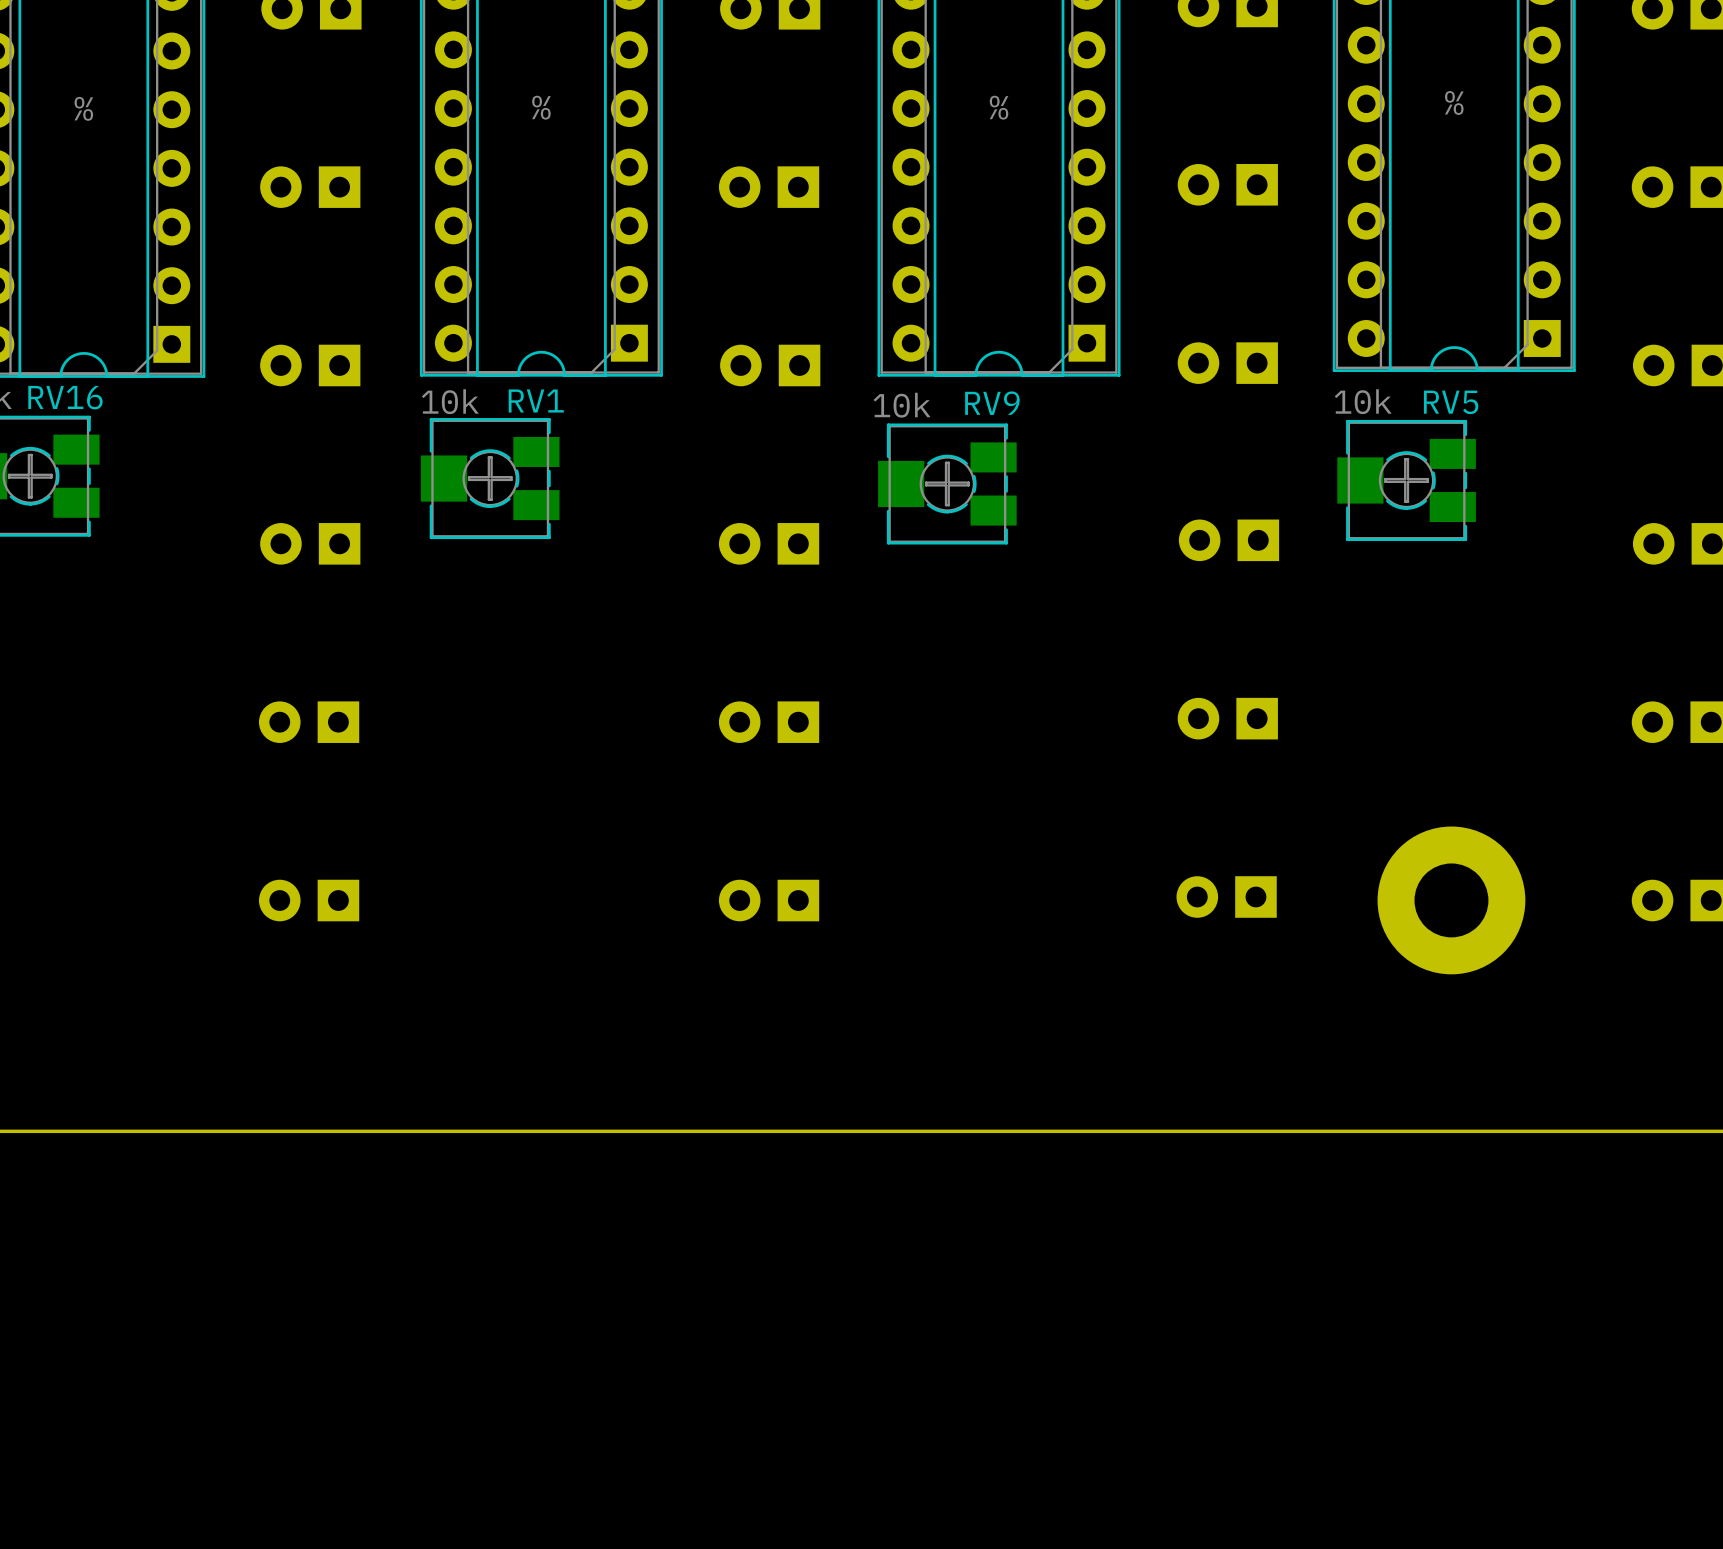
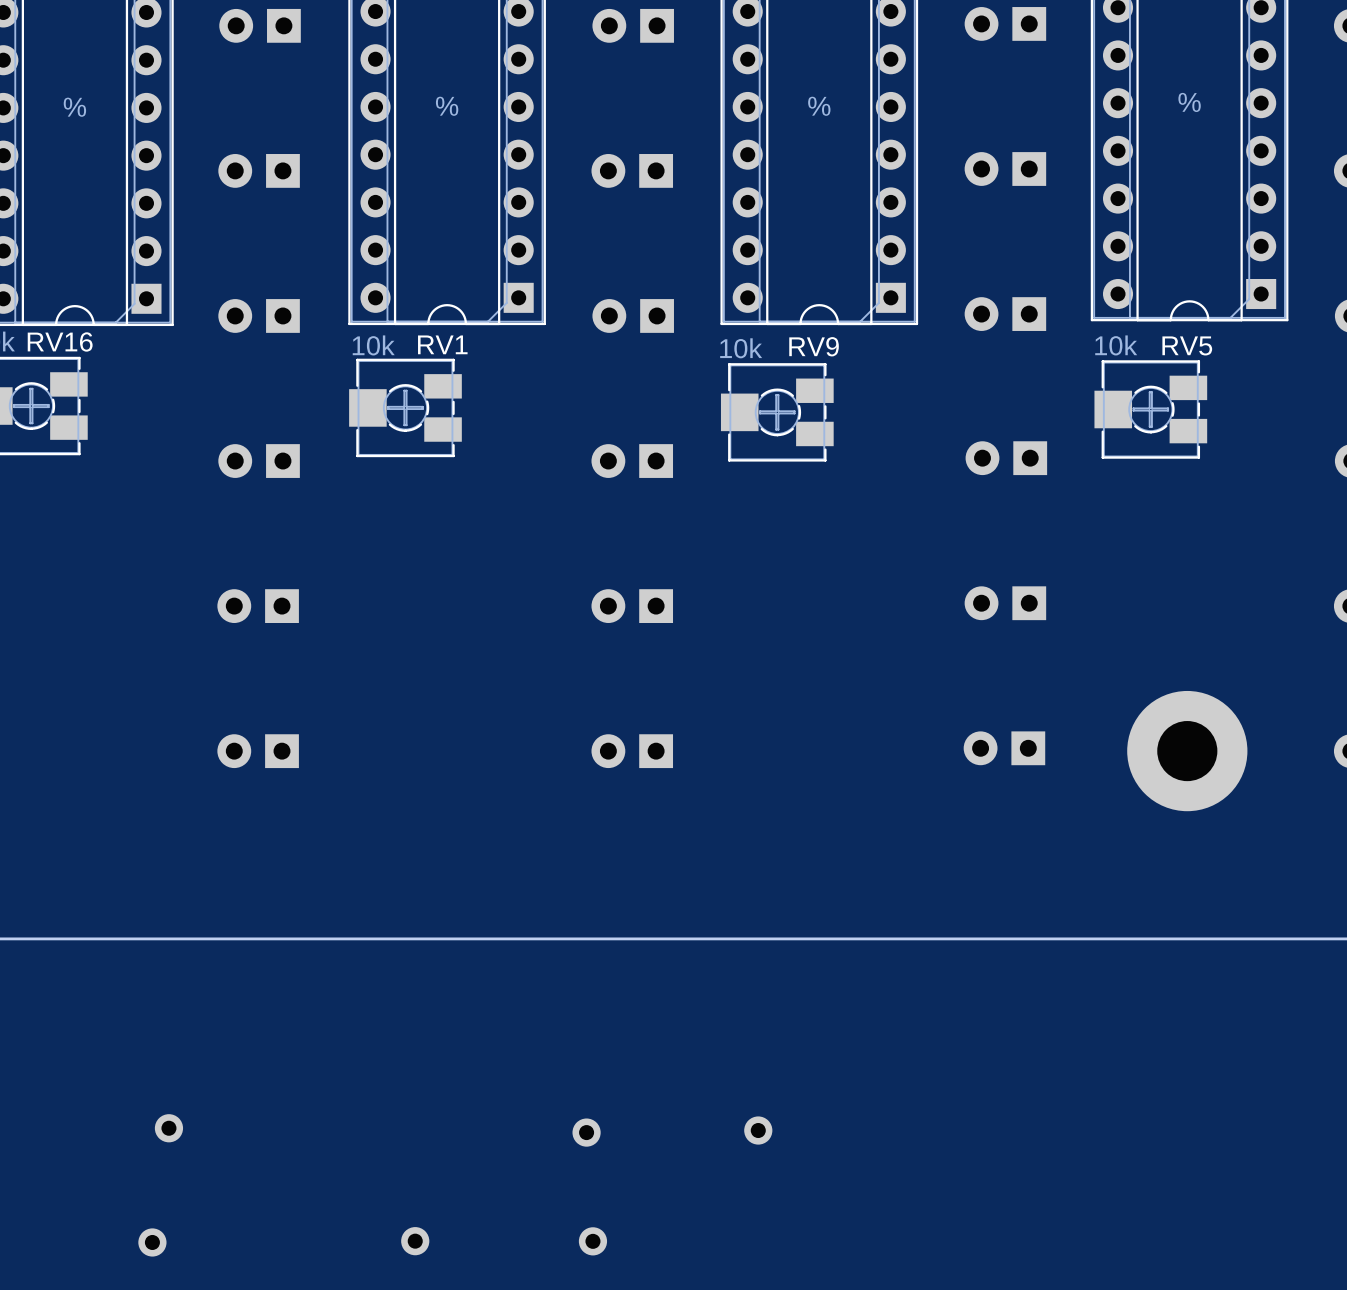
part: none -> (168, 1128)
part: none -> (758, 1130)
part: none -> (586, 1132)
part: none -> (415, 1241)
part: none -> (592, 1241)
part: none -> (152, 1242)

